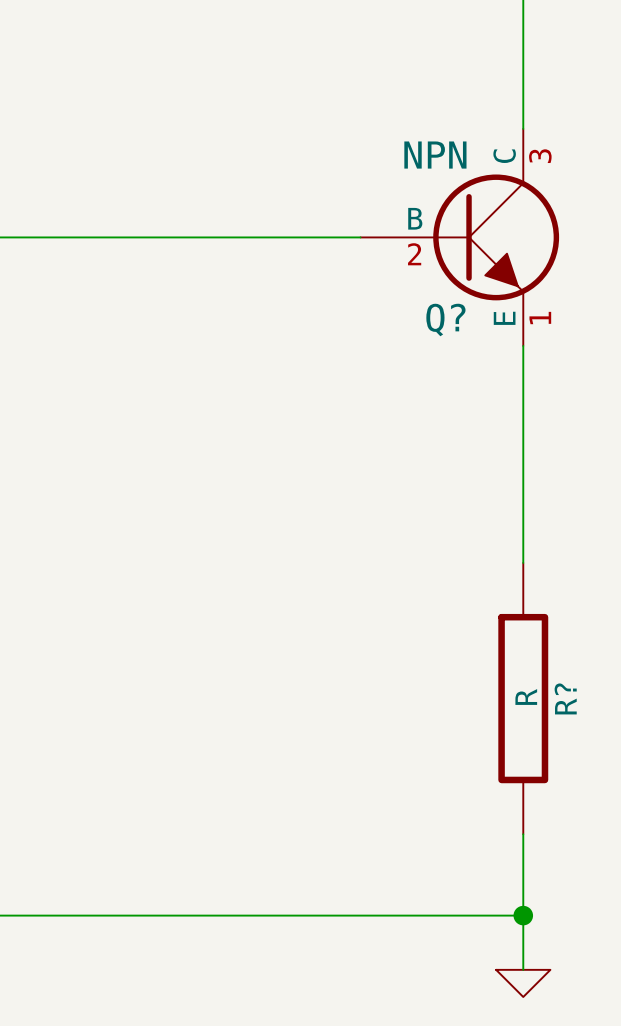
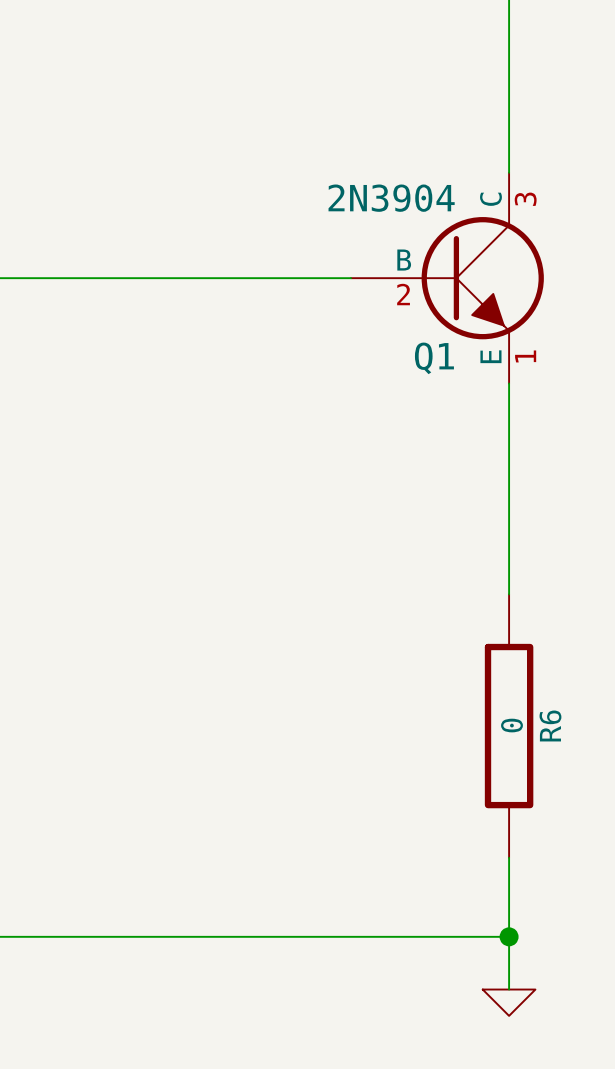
Q? value: NPN (435, 155) -> 2N3904 (391, 198)
Q? name: Q? (445, 320) -> Q1 (434, 358)
R? value: R (526, 697) -> 0 (512, 725)
R? name: R? (565, 698) -> R6 (550, 725)

